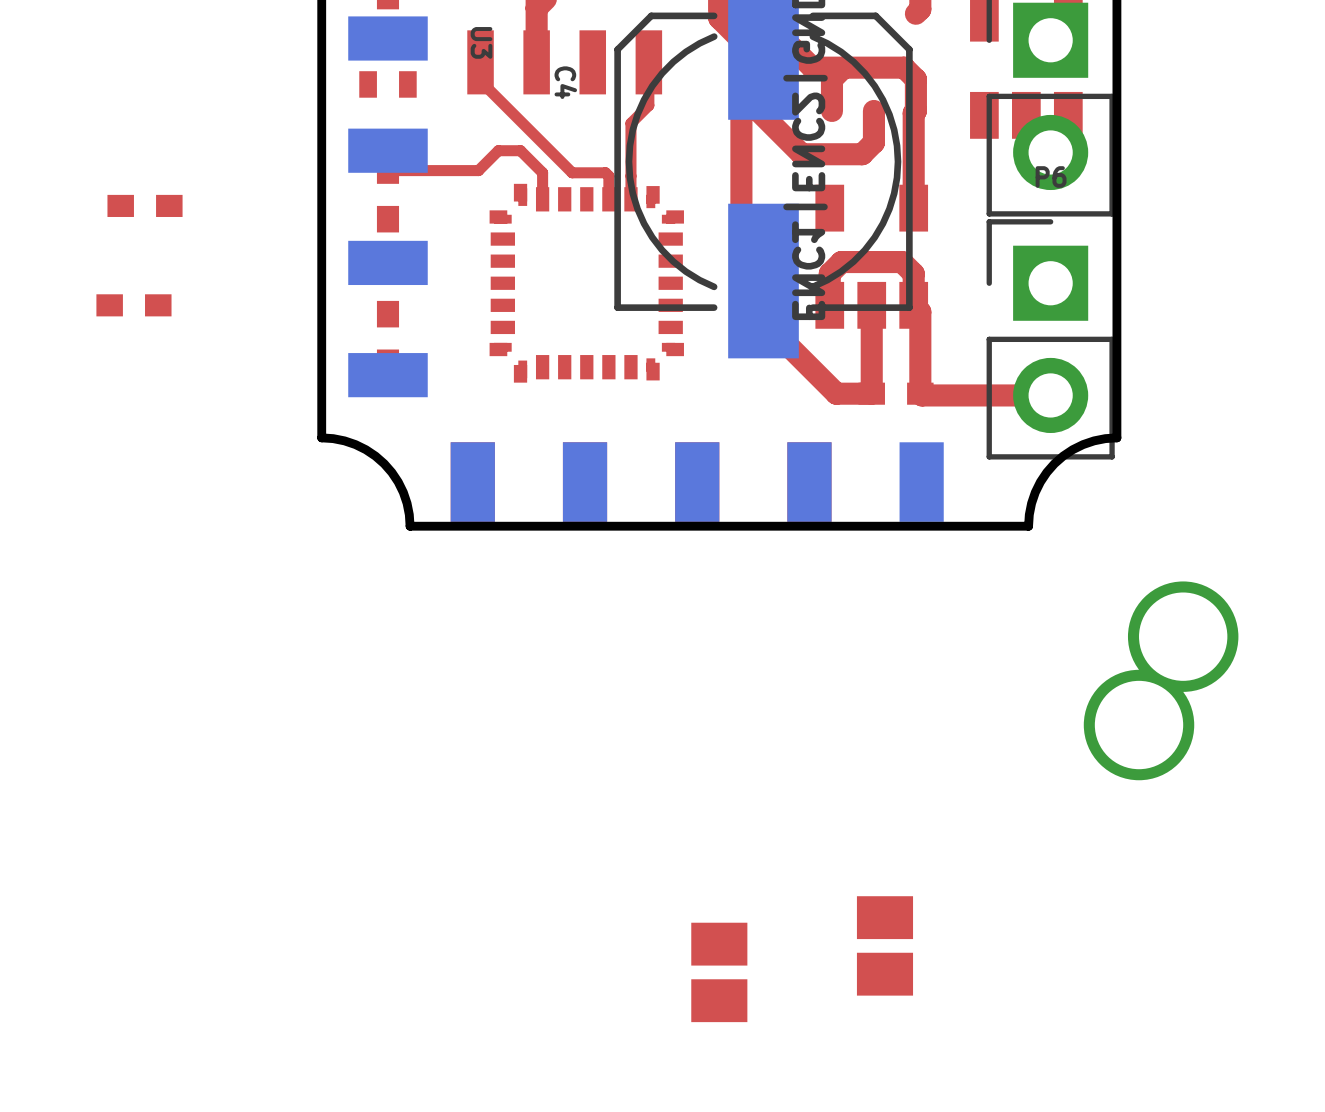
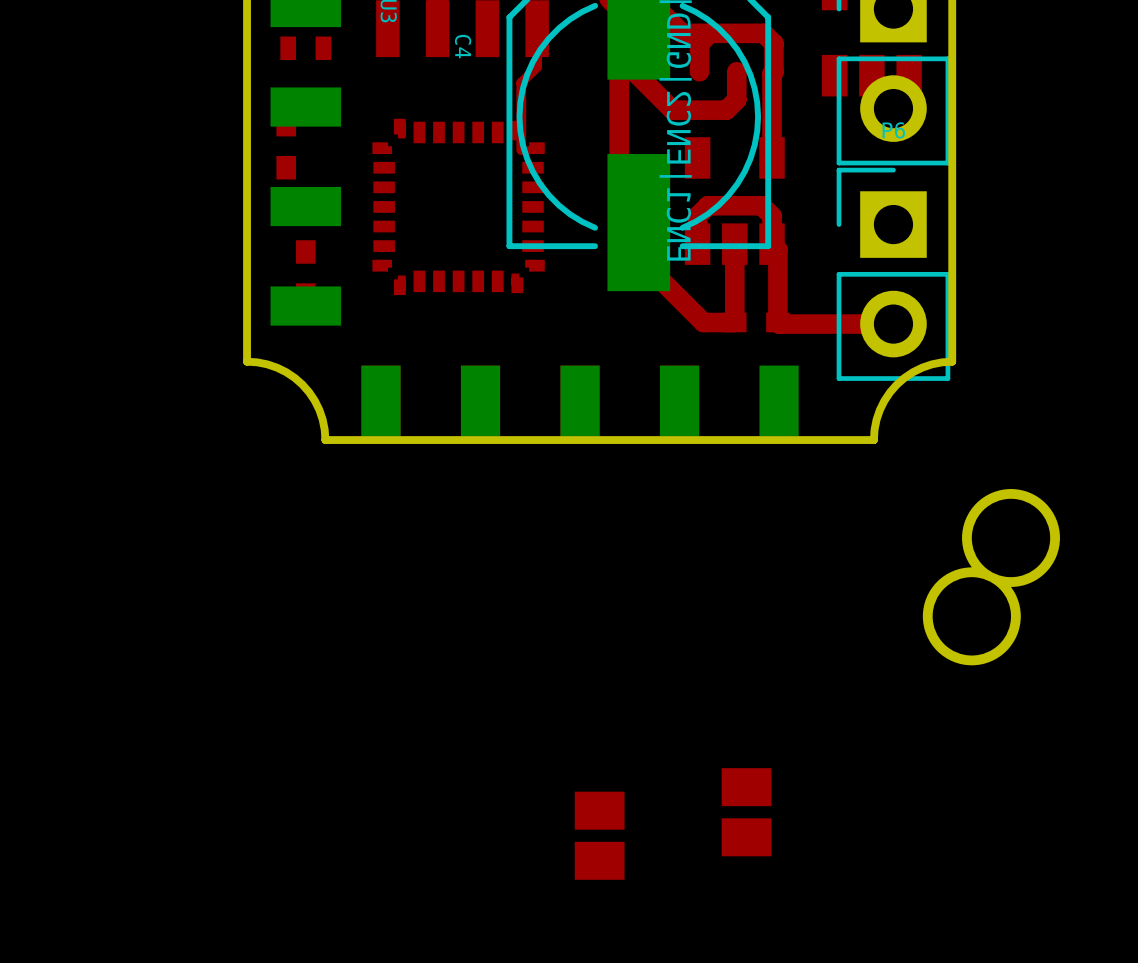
top track: (480, 62) (480, 81) (572, 172) (605, 172) (608, 176) (608, 199) -> none
top track: (387, 170) (478, 170) (498, 150) (520, 150) (542, 172) (542, 199) -> none
part position: (387, 194) -> (286, 146)
part: (145, 205) -> none
part position: (586, 283) -> (458, 206)
part: (133, 305) -> none

